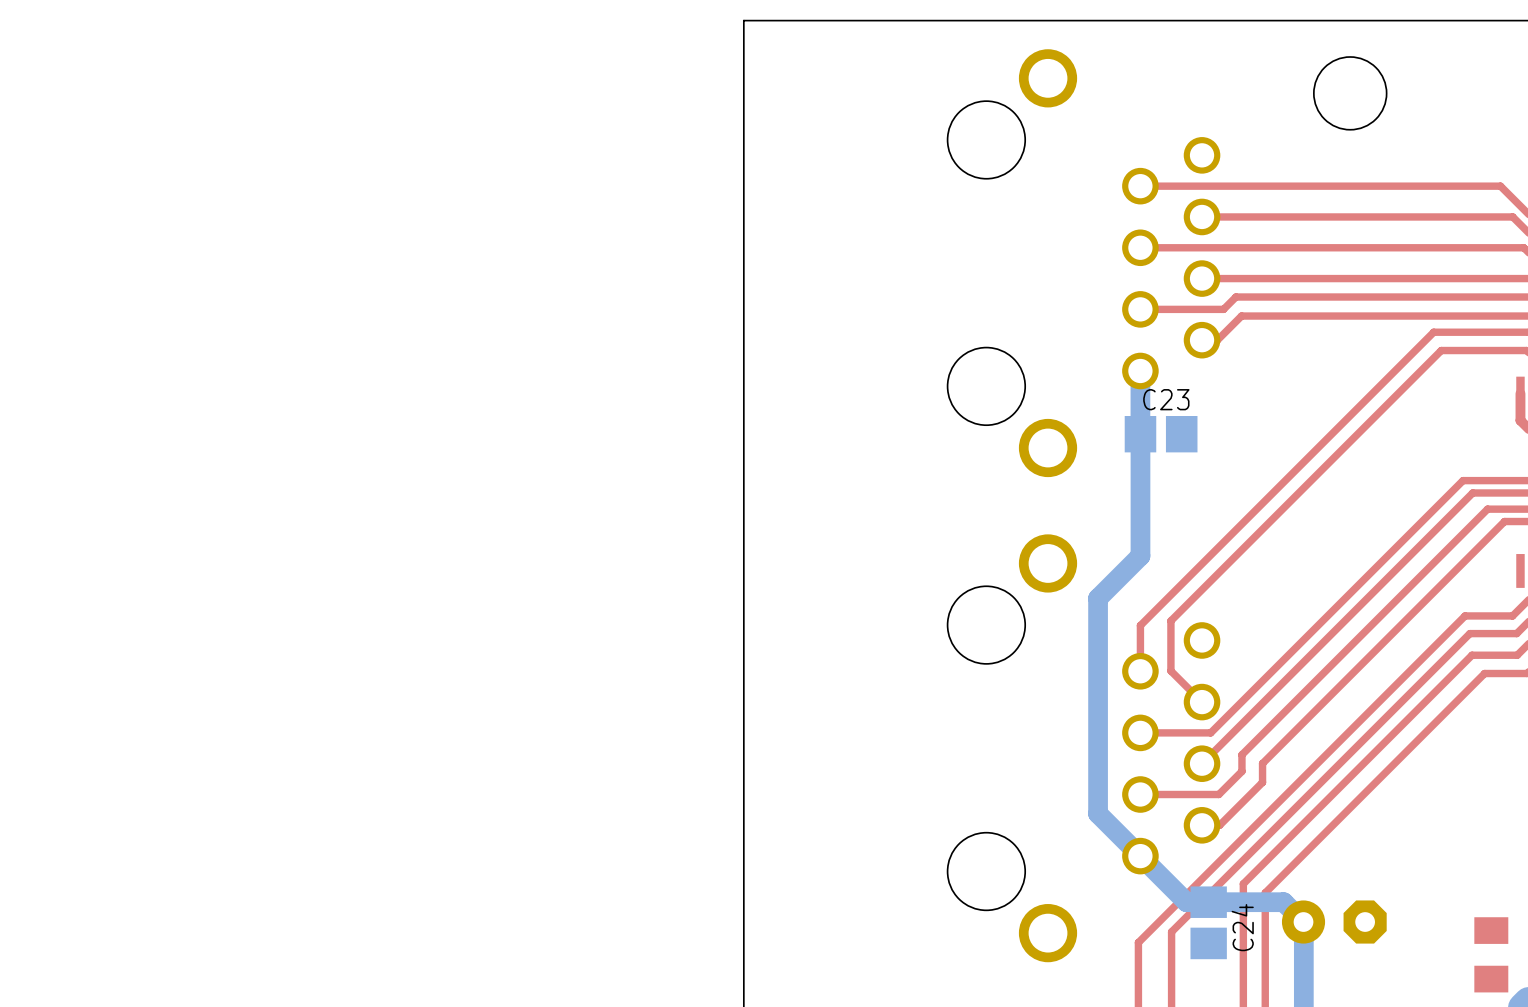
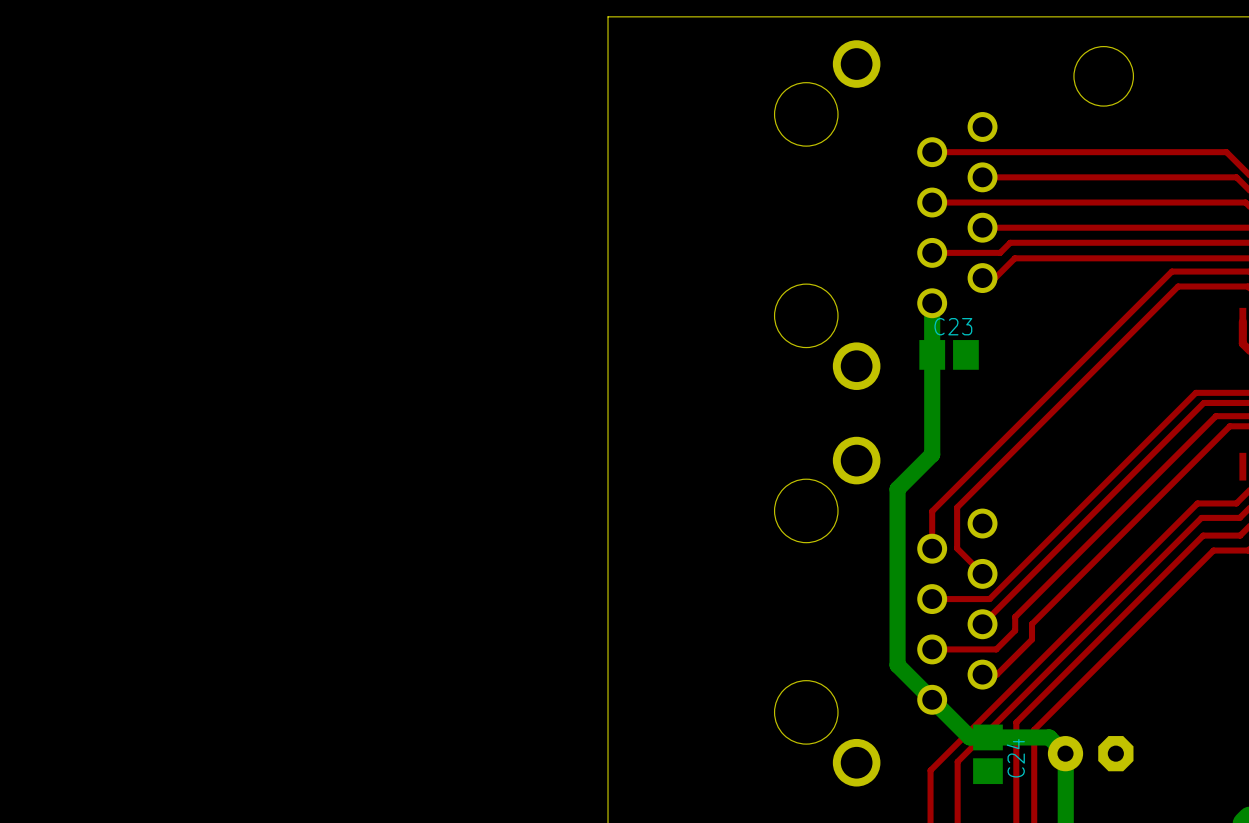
part: (1491, 954) -> none

